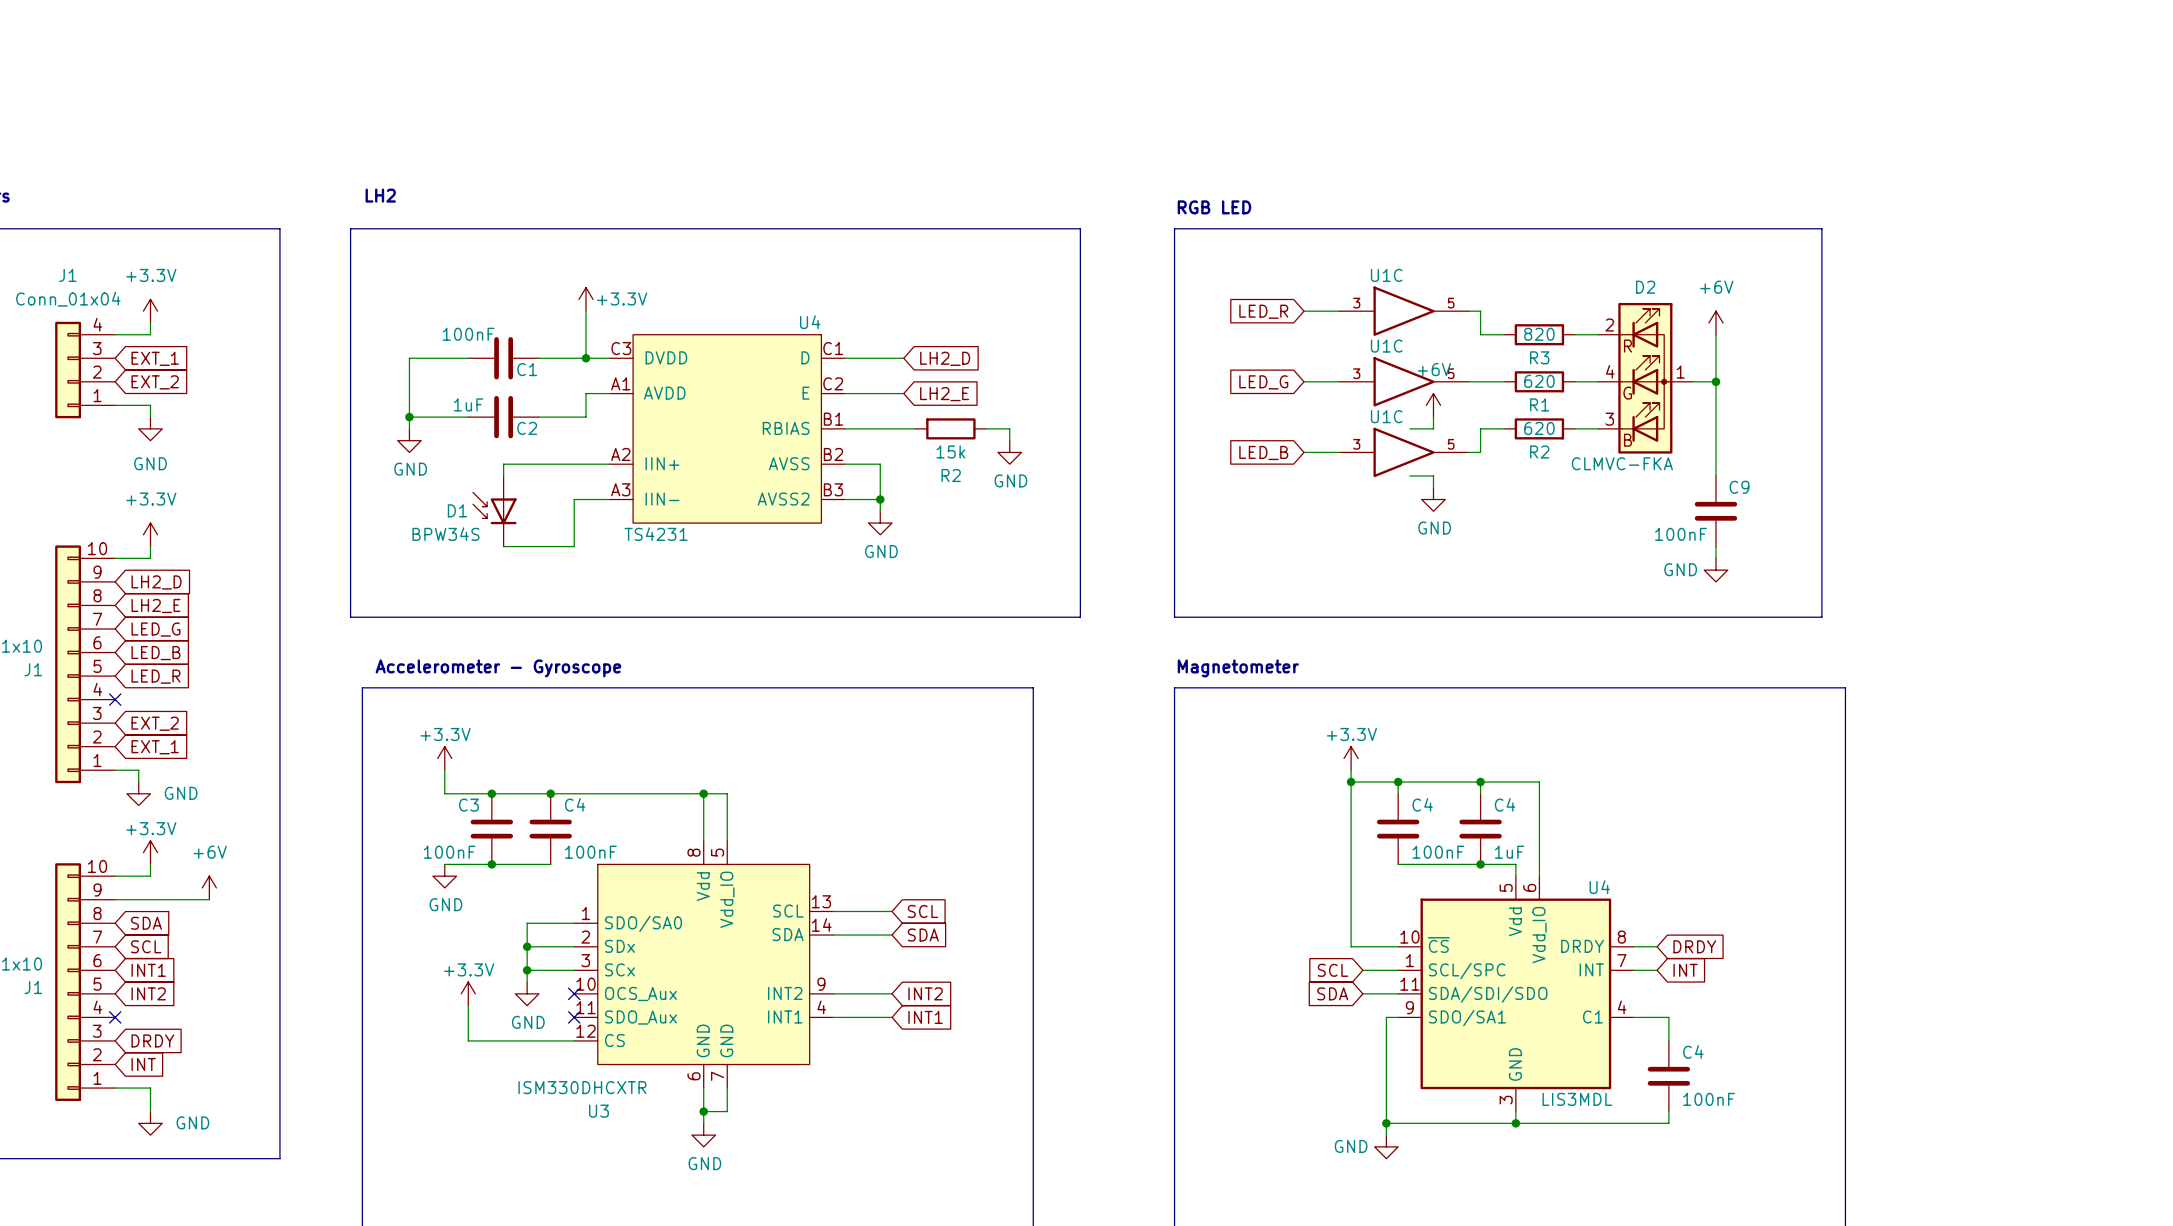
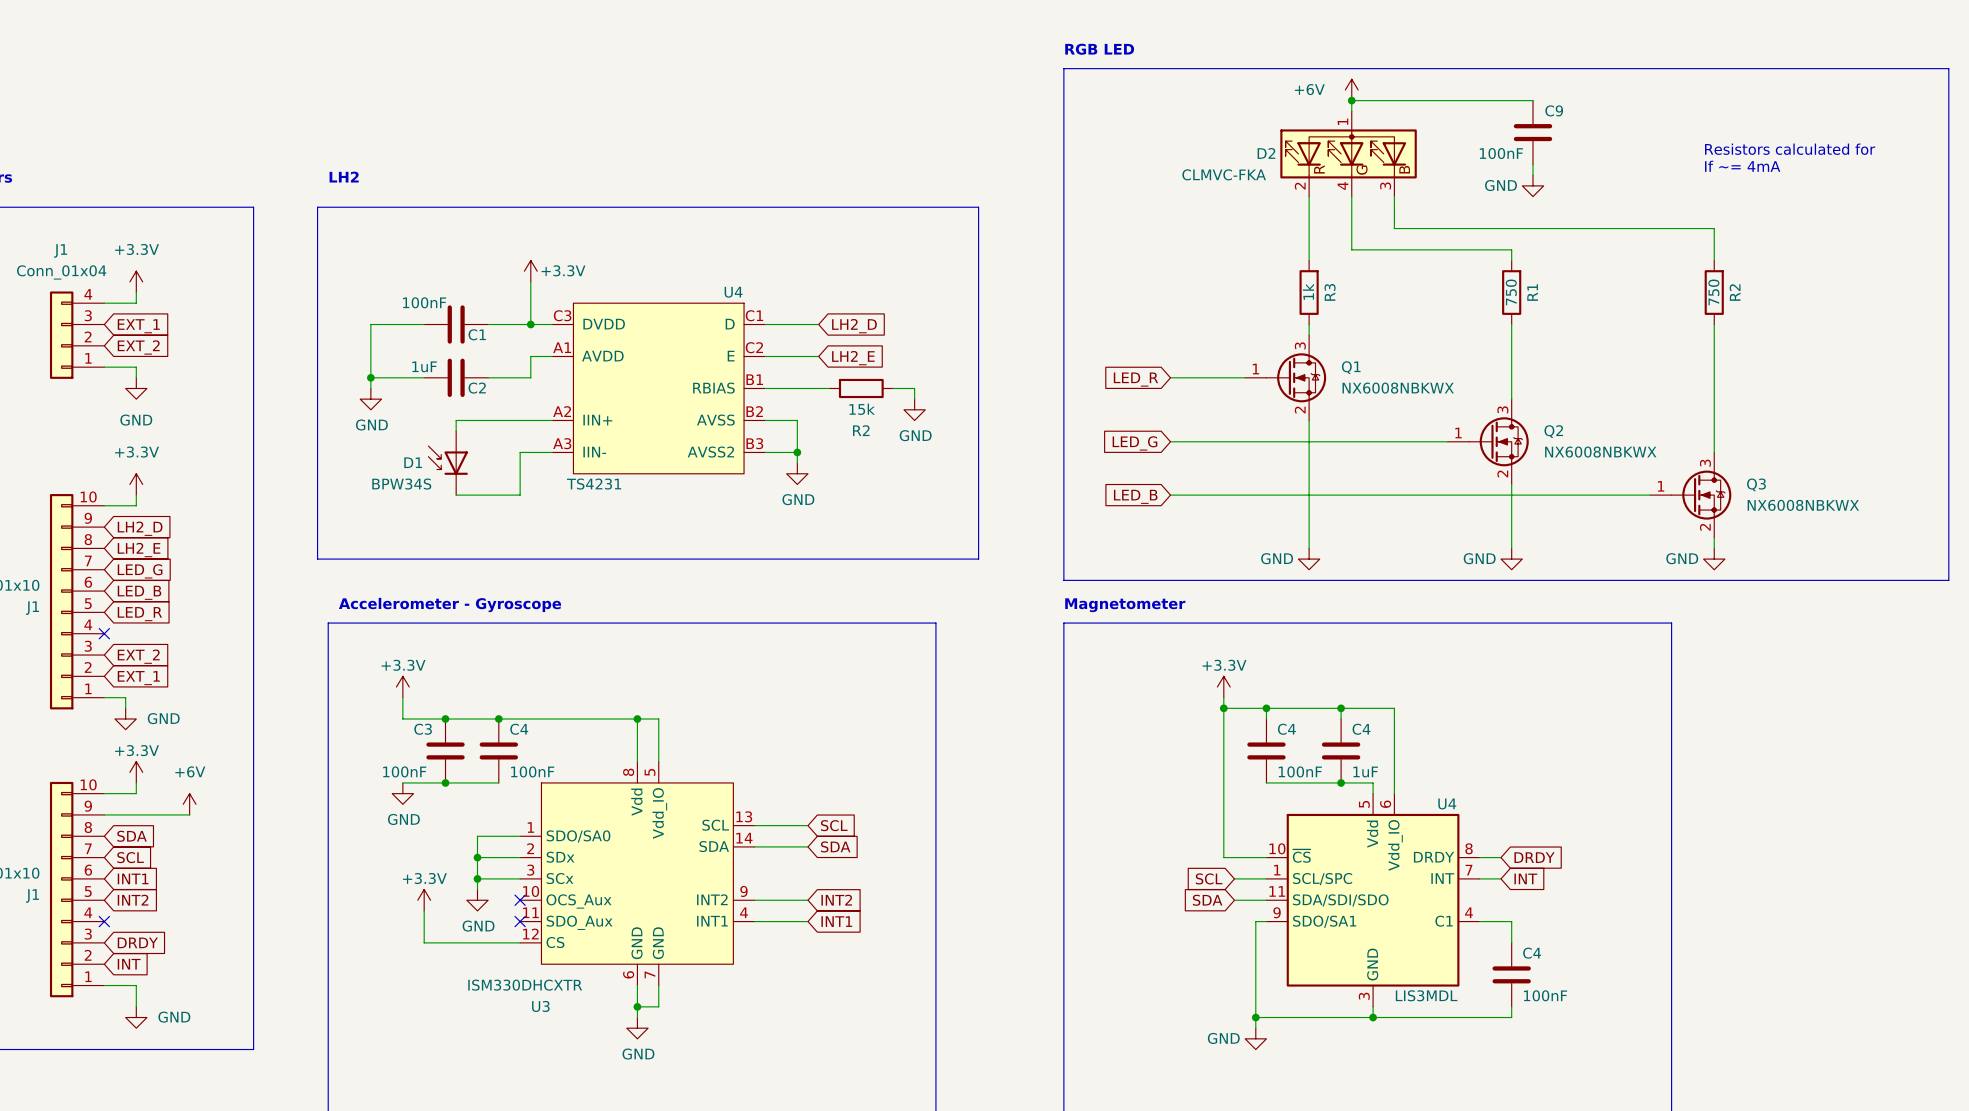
power symbol: none -> +6V (1351, 89)
junction: none -> (1351, 100)
wire: none -> (1533, 100) (1351, 100) (1351, 111)
text: none -> Resistors calculated for (1790, 149)
wire: none -> (1533, 164) (1533, 175)
text: none -> If ~= 4mA (1742, 166)
power symbol: none -> GND (1533, 185)
text position: RGB LED (1214, 207) -> RGB LED (1099, 49)
wire: none -> (1309, 196) (1309, 260)
wire: none -> (1351, 196) (1351, 249) (1511, 249) (1511, 260)
wire: none -> (1394, 196) (1394, 228) (1714, 228) (1714, 260)
line: (1174, 228) (1821, 228) (1821, 617) (1174, 617) -> (1063, 207) (1063, 68) (1948, 68) (1948, 580) (1063, 580) (1063, 559)
global label position: LED_R (1263, 311) -> LED_R (1135, 379)
wire: (1304, 311) (1339, 311) -> none
U1C: (1404, 311) -> none
wire: (1468, 311) (1480, 311) (1480, 334) (1504, 334) -> none
power symbol: +6V (1715, 322) -> none
R2: none -> 750 (1714, 292)
R3 rotation: 0° (1539, 334) -> 90° clockwise (1309, 292)
R3 position: (1539, 334) -> (1309, 292)
R3 value: 820 (1539, 334) -> 1k (1308, 291)
wire: (1574, 334) (1598, 334) -> none
wire: (1715, 334) (1715, 475) -> (1714, 324) (1714, 452)
R3 name position: R3 (1539, 357) -> R3 (1330, 292)
wire: none -> (1309, 324) (1309, 335)
D2 rotation: 0° (1645, 378) -> 90° counterclockwise (1348, 153)
D2 position: (1645, 378) -> (1348, 153)
wire: (1304, 381) (1339, 381) -> none
U1C: (1404, 381) -> none
wire: (1468, 381) (1504, 381) -> none
R1 rotation: 0° (1539, 381) -> 90° clockwise (1511, 292)
R1 position: (1539, 381) -> (1511, 292)
R1 value: 620 (1539, 381) -> 750 (1511, 292)
wire: (1574, 381) (1598, 381) -> none
wire: (1692, 381) (1715, 381) -> none
junction: (1715, 381) -> none
global label position: LED_G (1263, 382) -> LED_G (1134, 443)
R1 name position: R1 (1539, 404) -> R1 (1532, 292)
power symbol: +6V (1433, 405) -> none
wire: none -> (1170, 377) (1245, 377)
Q1: none -> NX6008NBKWX (1285, 377)
wire: (1433, 417) (1433, 428) (1409, 428) -> none
wire: (1504, 428) (1480, 428) (1480, 452) (1468, 452) -> none
R2: 620 (1539, 428) -> none
wire: (1574, 428) (1598, 428) -> none
global label position: LED_B (1263, 452) -> LED_B (1135, 496)
wire: (1304, 452) (1339, 452) -> none
U1C: (1404, 452) -> none
D2 value position: CLMVC-FKA (1622, 463) -> CLMVC-FKA (1224, 174)
wire: none -> (1309, 420) (1309, 548)
wire: (1409, 475) (1433, 475) (1433, 487) -> none
wire: none -> (1170, 441) (1447, 441)
Q2: none -> NX6008NBKWX (1488, 441)
power symbol position: GND (1433, 499) -> GND (1309, 559)
C9 position: (1715, 511) -> (1533, 132)
power symbol text position: GND (1434, 528) -> GND (1277, 558)
wire: none -> (1511, 484) (1511, 548)
wire: none -> (1170, 495) (1650, 495)
wire: (1715, 546) (1715, 558) -> (1714, 537) (1714, 548)
Q3: none -> NX6008NBKWX (1690, 495)
power symbol position: GND (1715, 570) -> GND (1511, 559)
power symbol: none -> GND (1714, 559)

